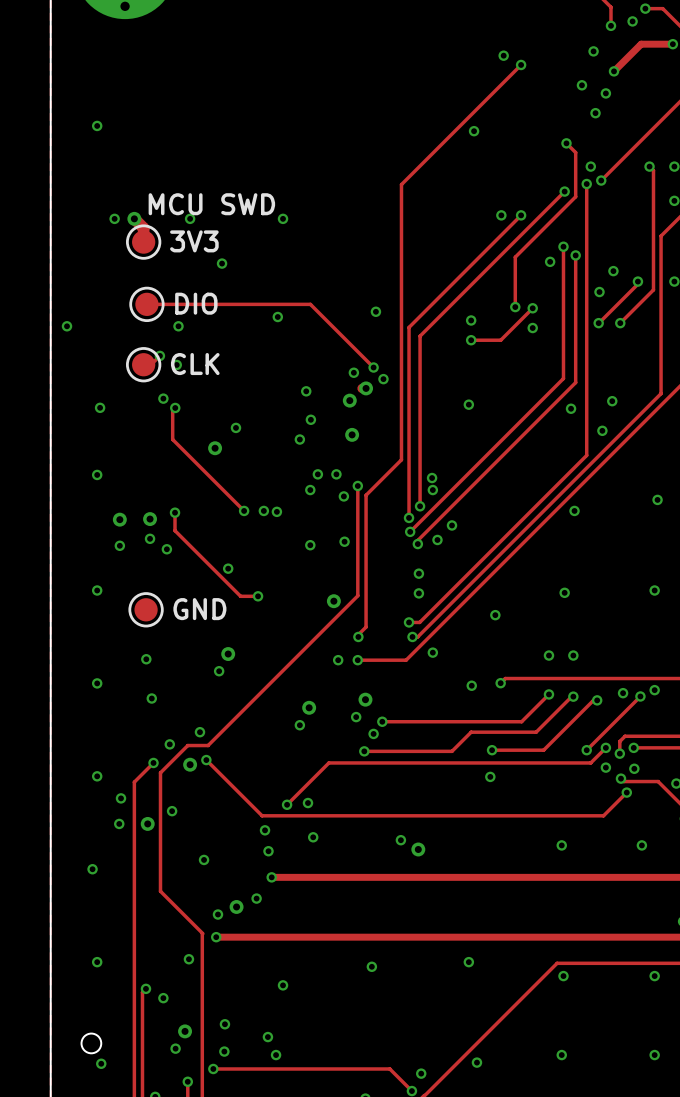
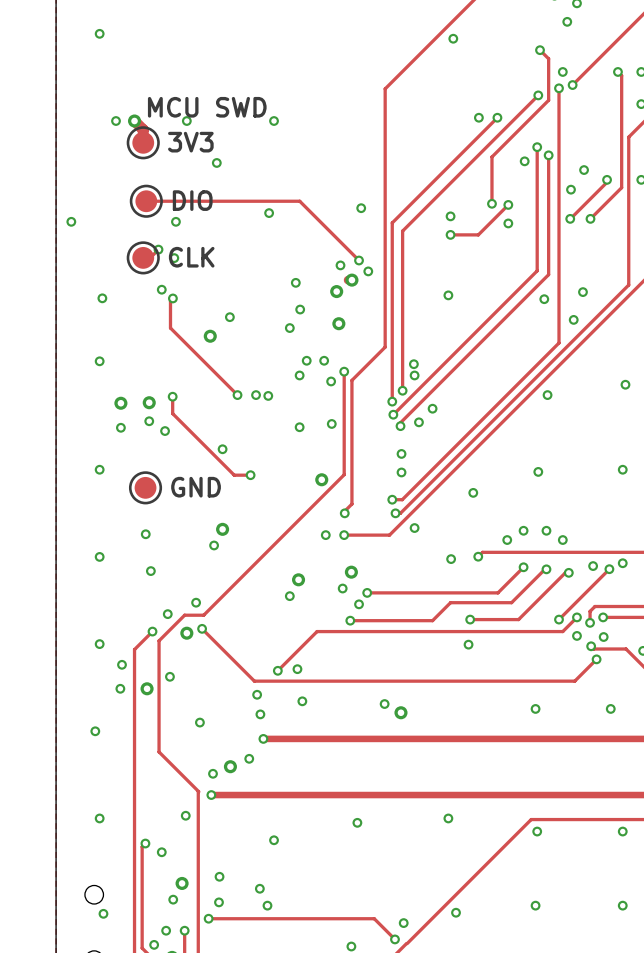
via: none -> (507, 540)
via: none -> (562, 540)
via: none -> (166, 930)

